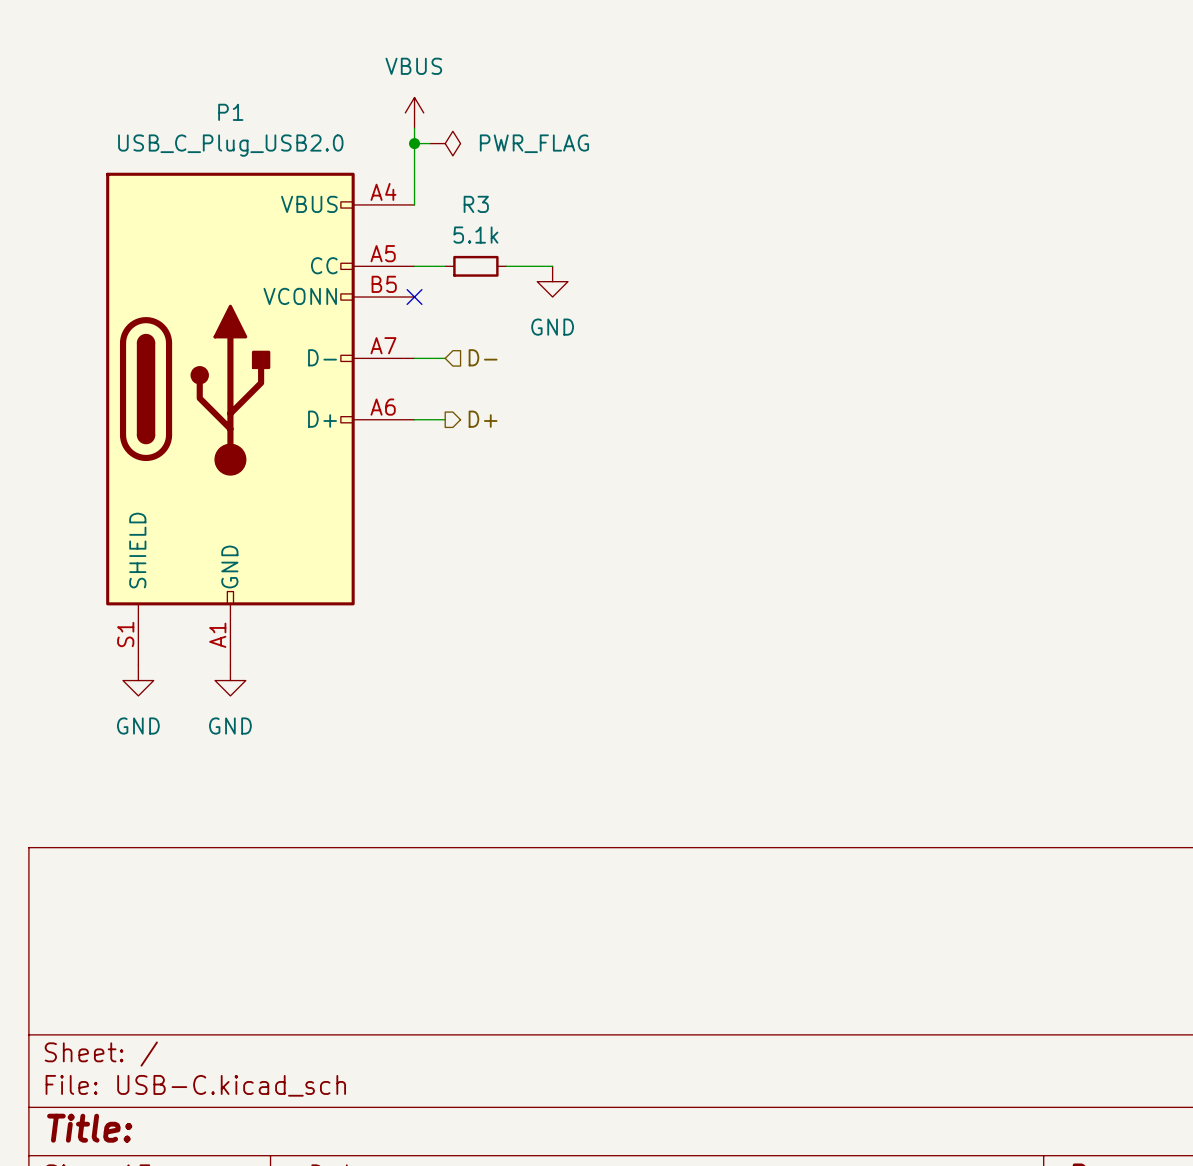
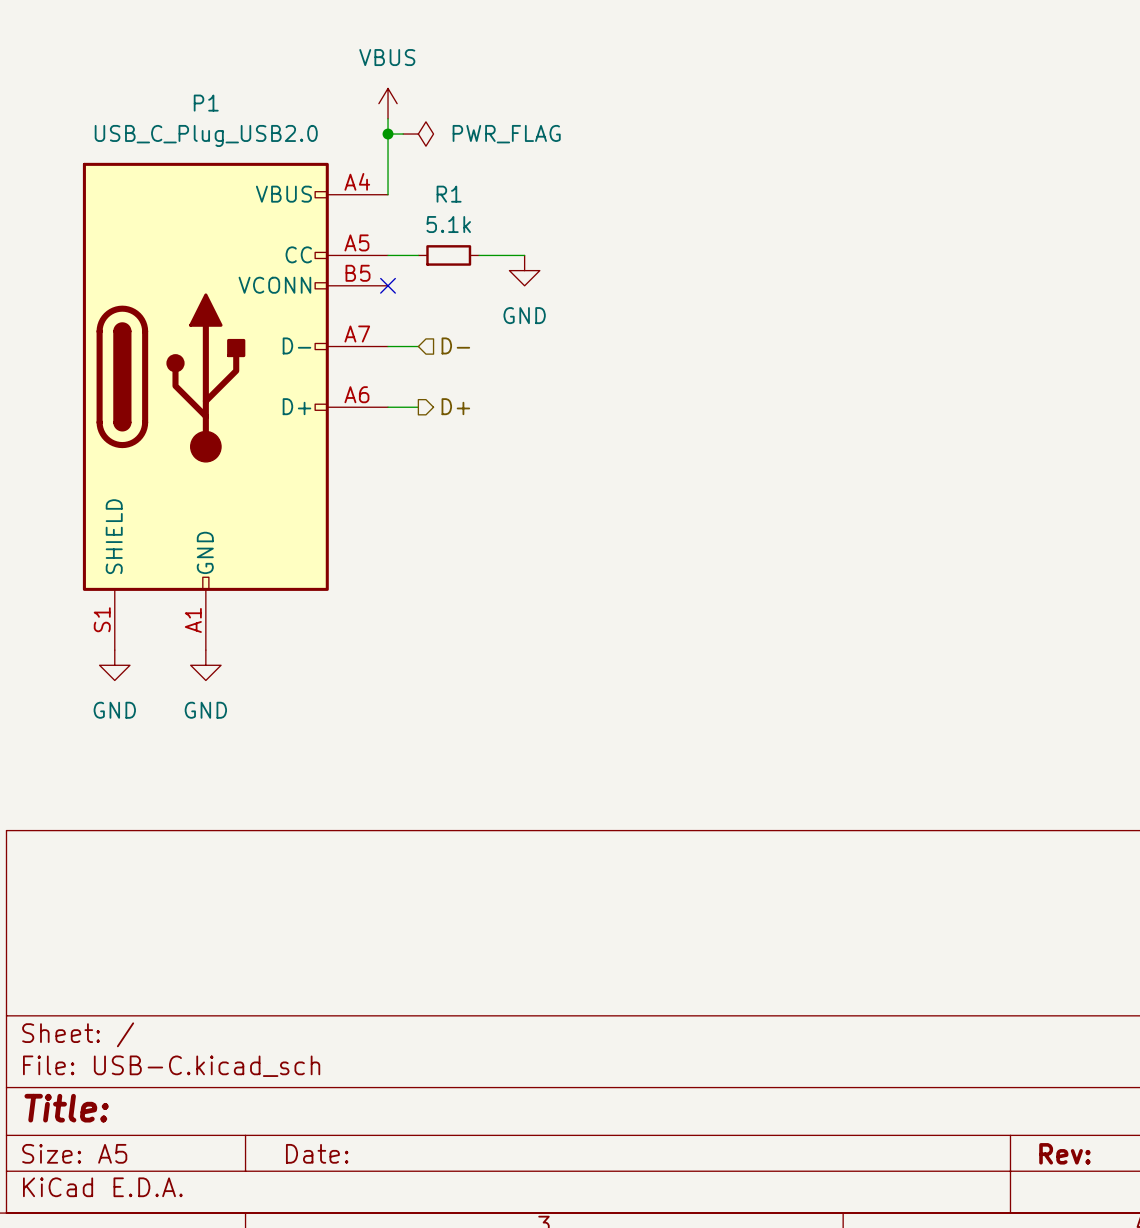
R3 name: R3 (476, 204) -> R1 (449, 194)

